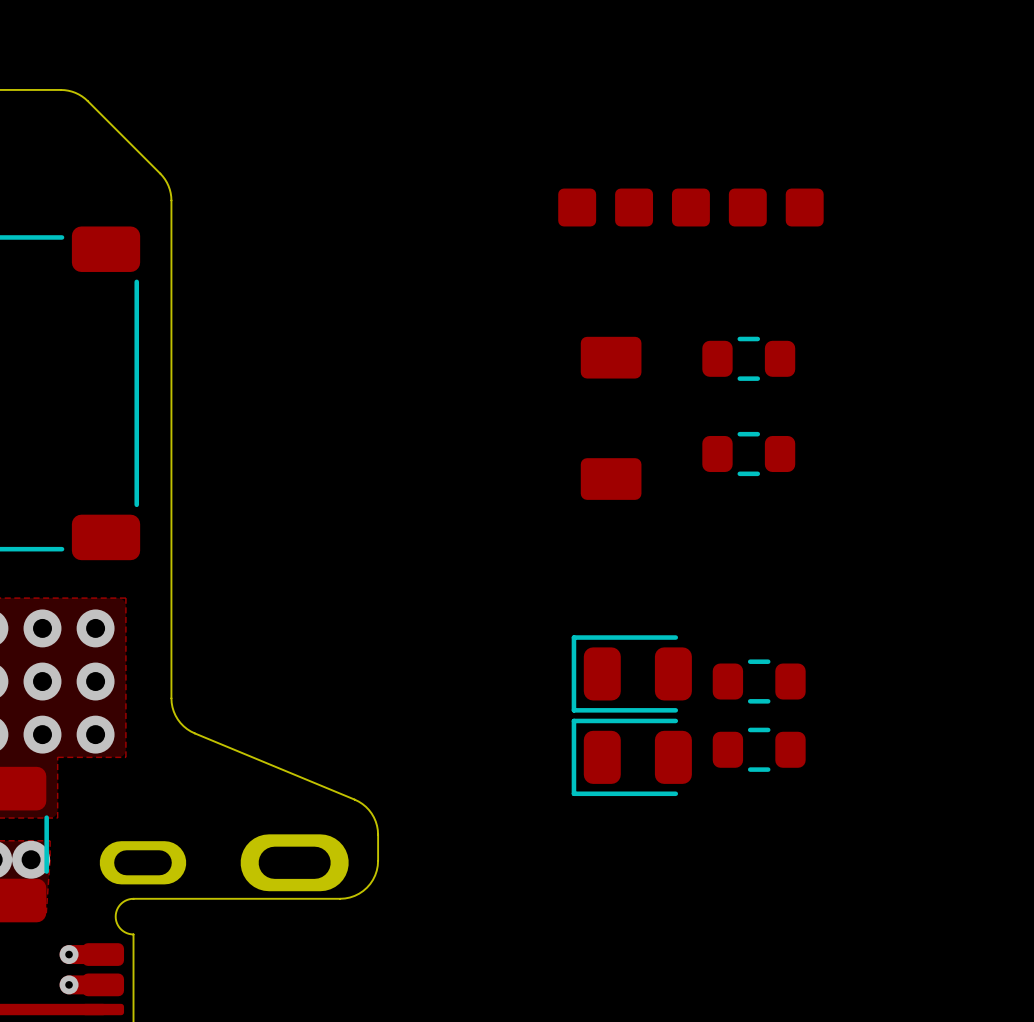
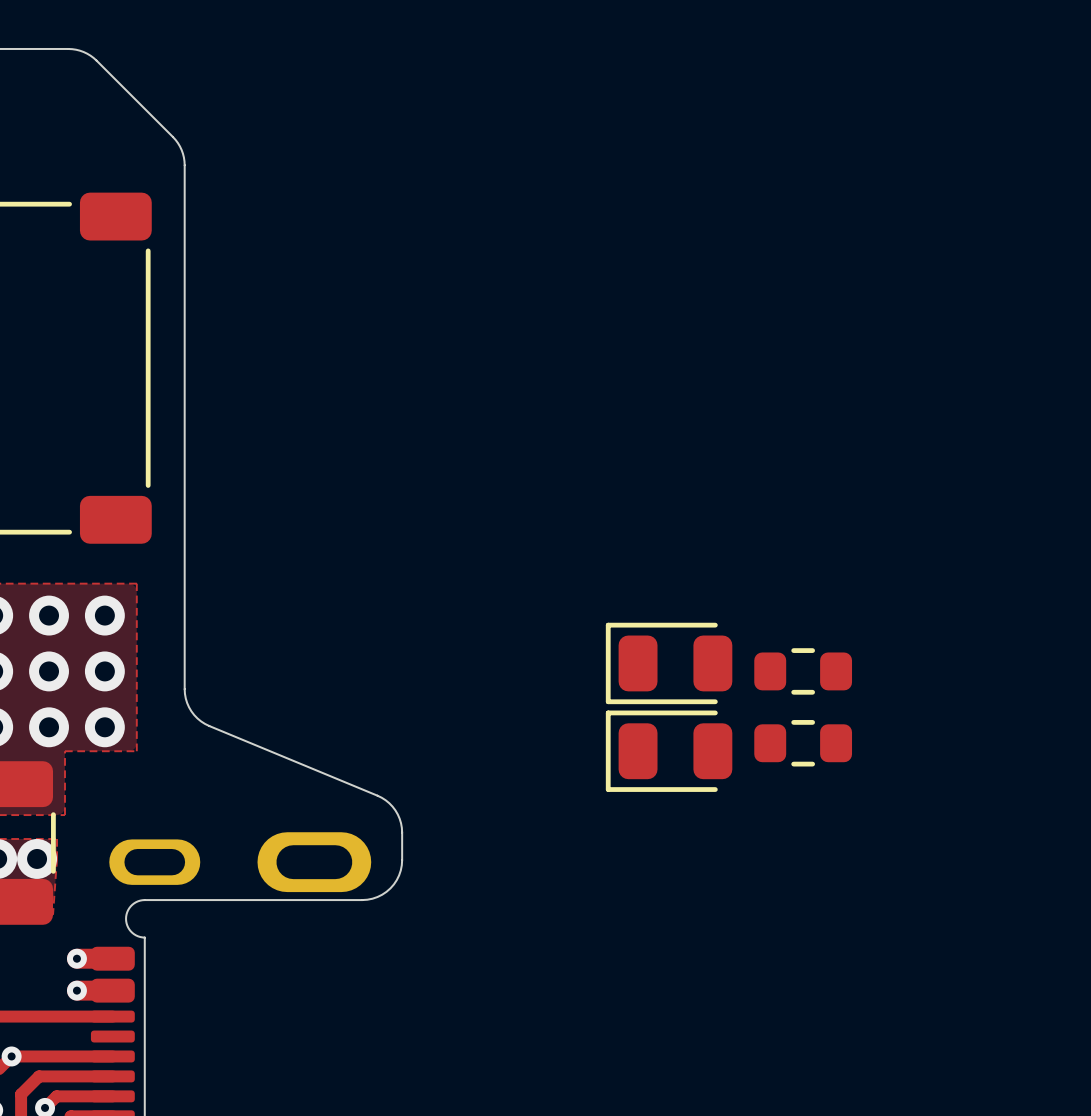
part: (690, 207) -> none
part: (748, 358) -> none
part: (611, 418) -> none
part: (748, 454) -> none

